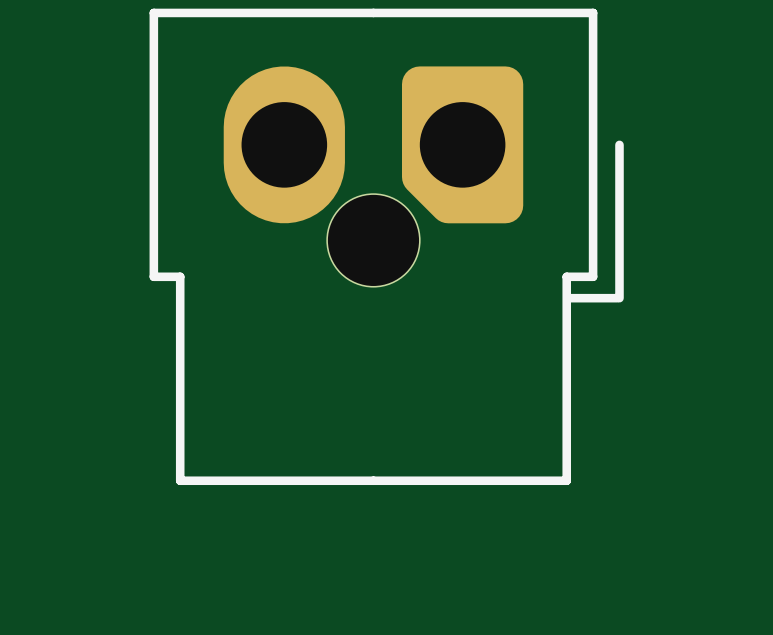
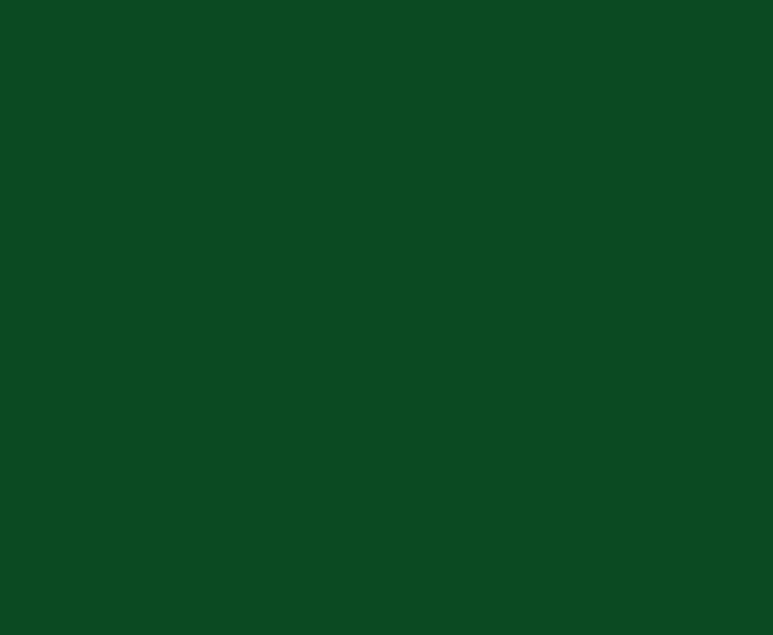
part: (386, 246) -> none

